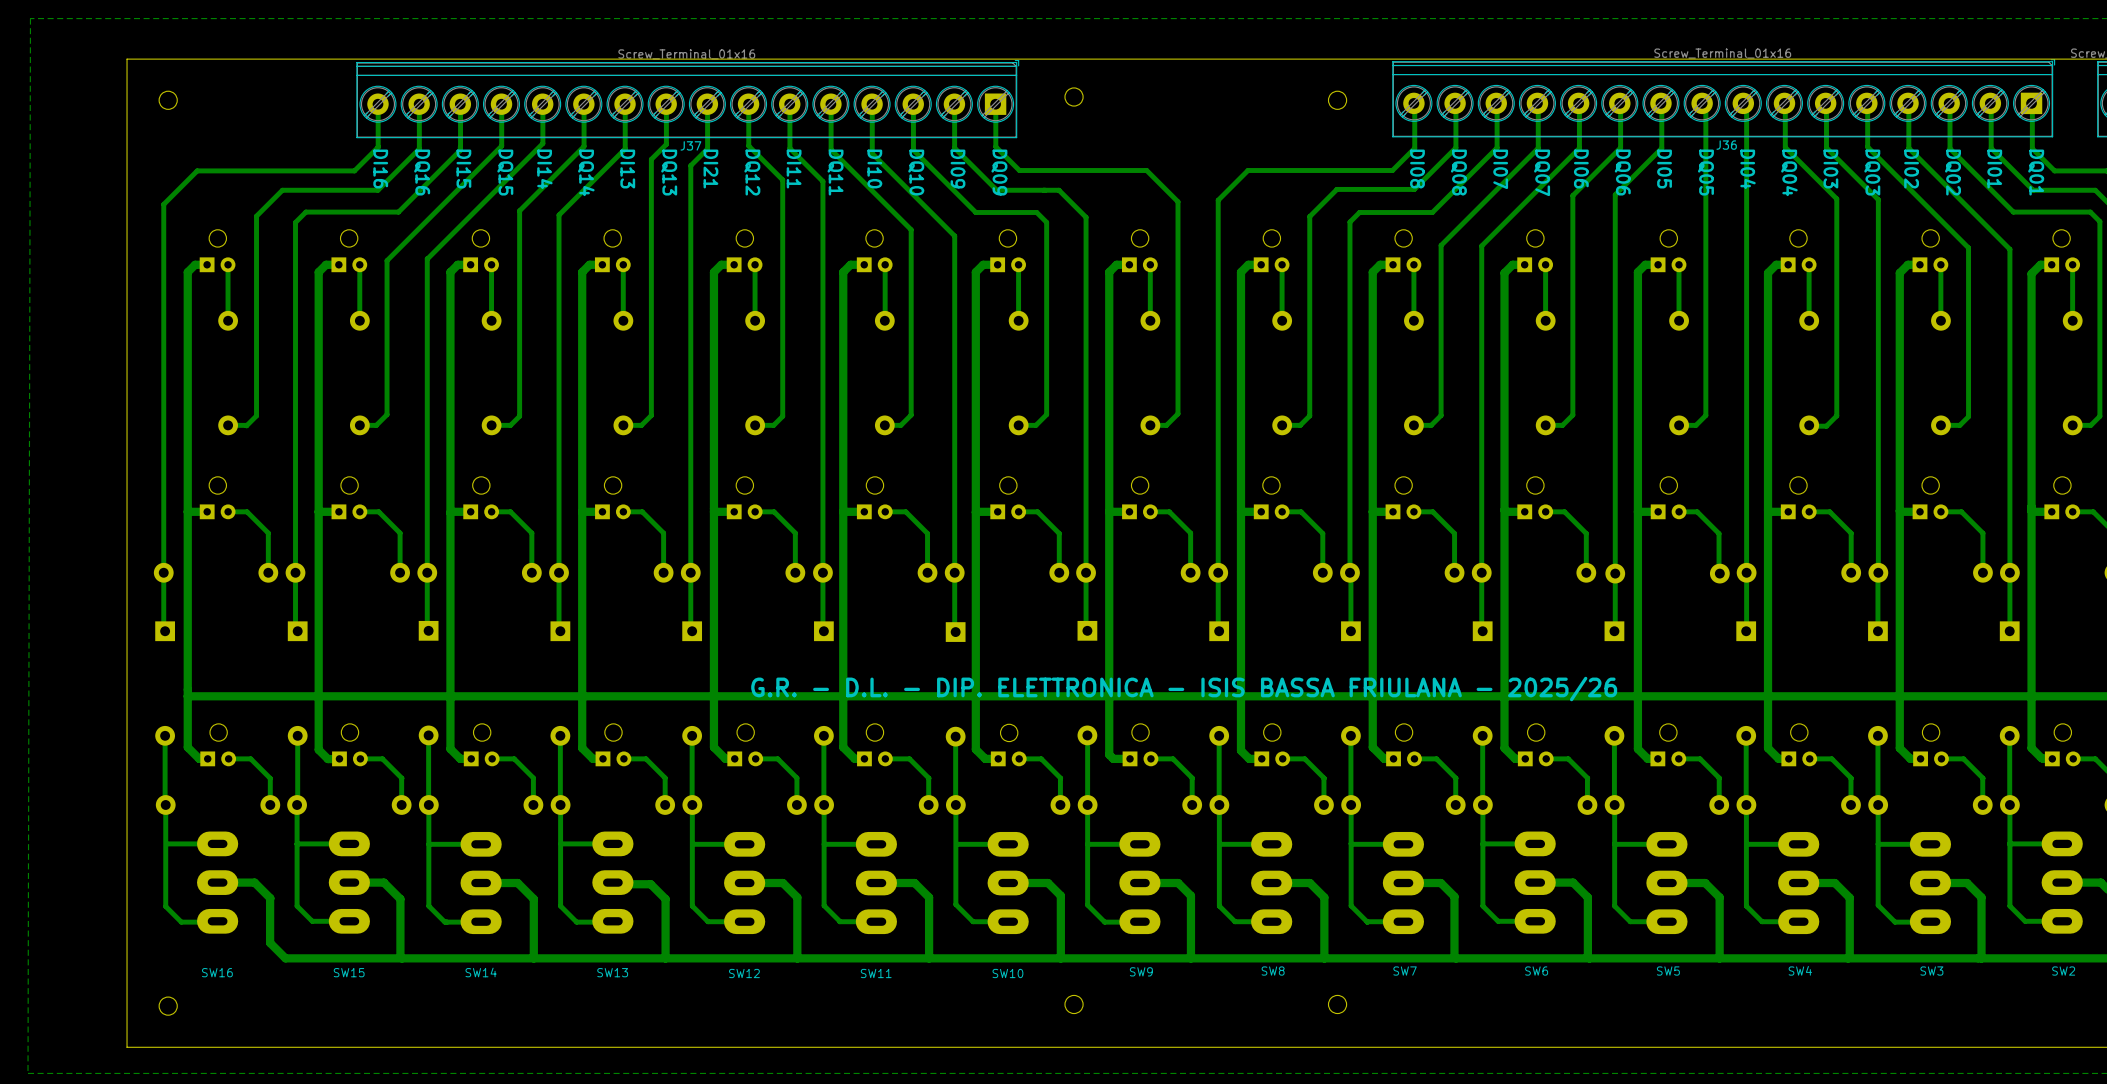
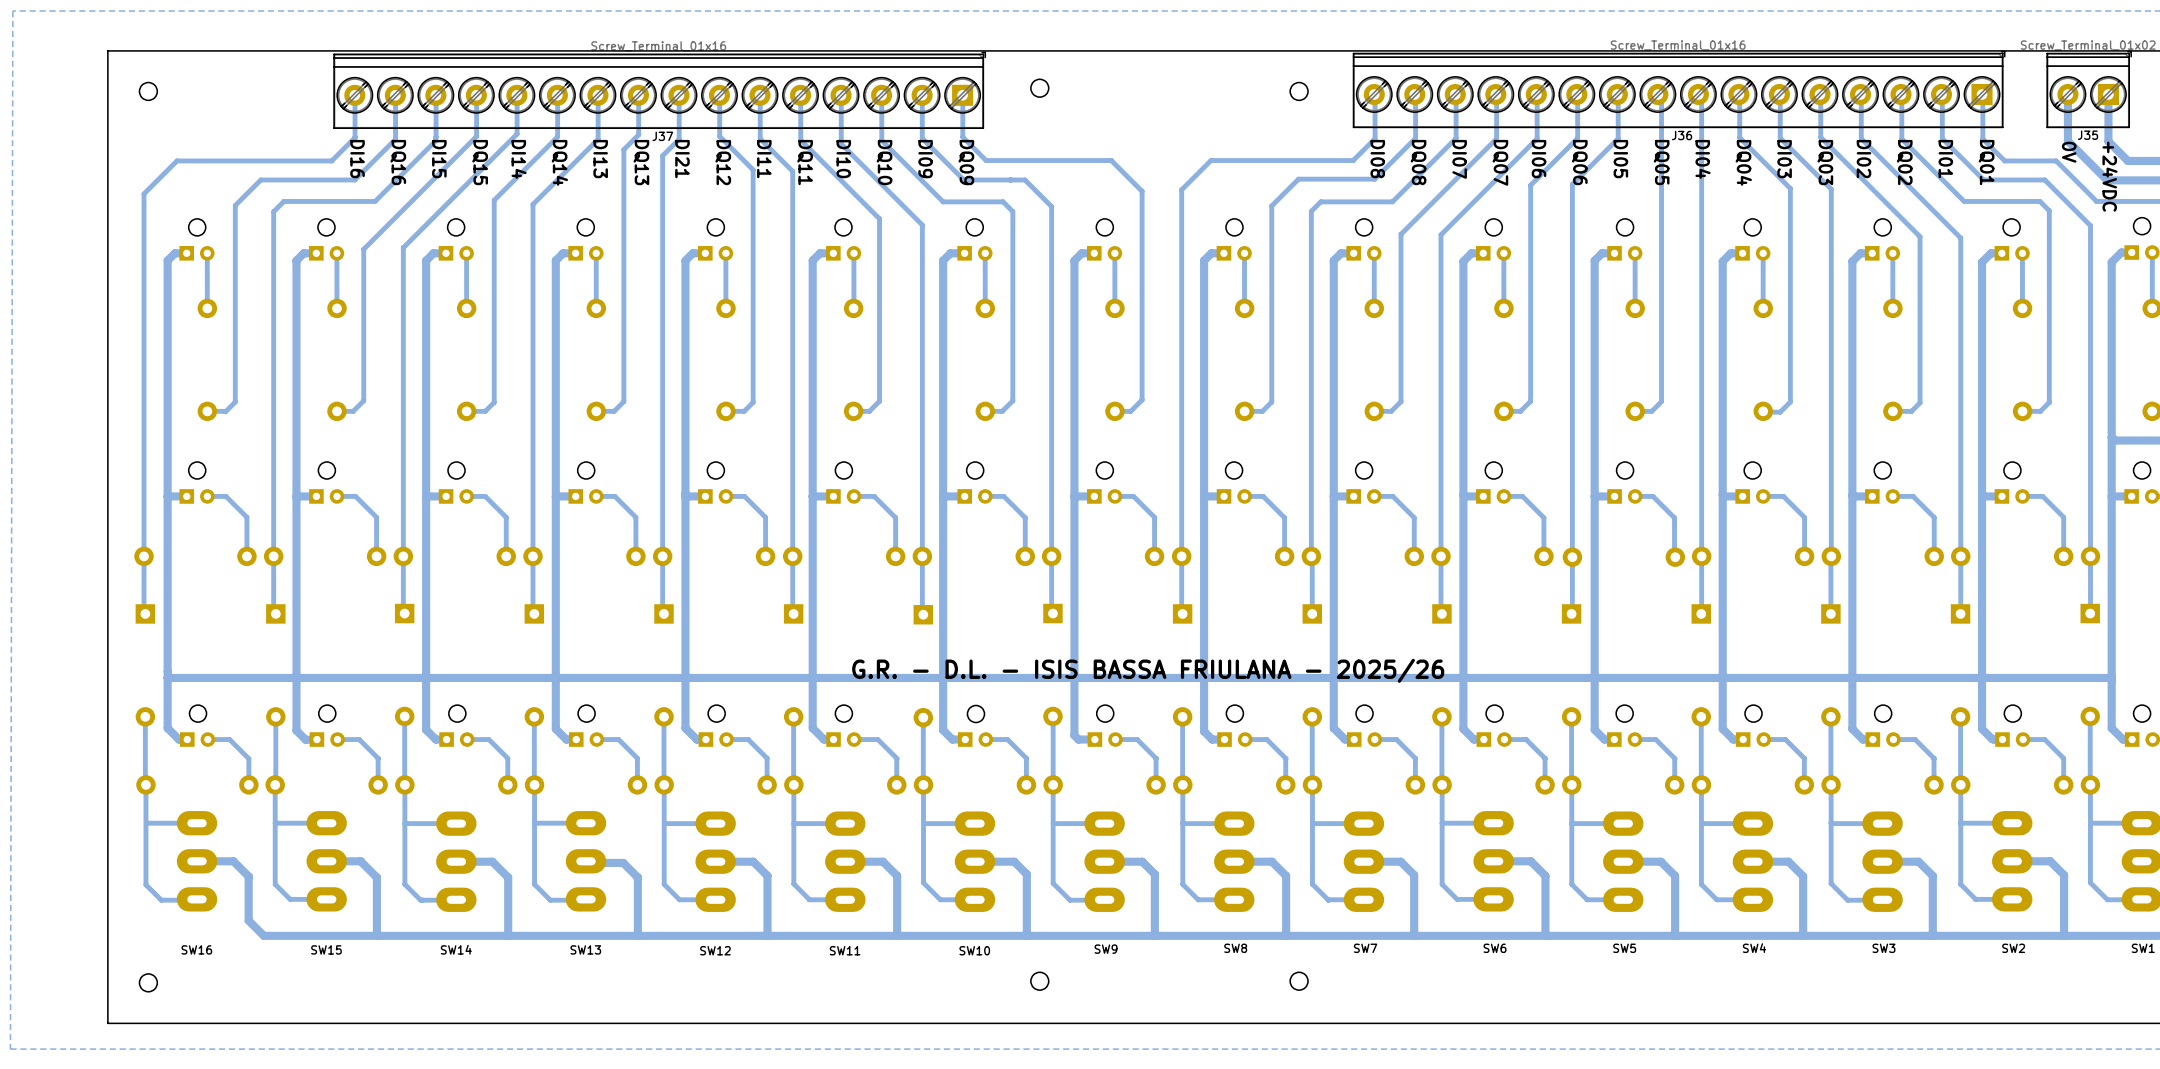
text: G.R. - D.L. - DIP. ELETTRONICA - ISIS BASSA FRIULANA - 2025/26 (1184, 689) -> G.R. - D.L. - ISIS BASSA FRIULANA - 2025/26 (1148, 670)

